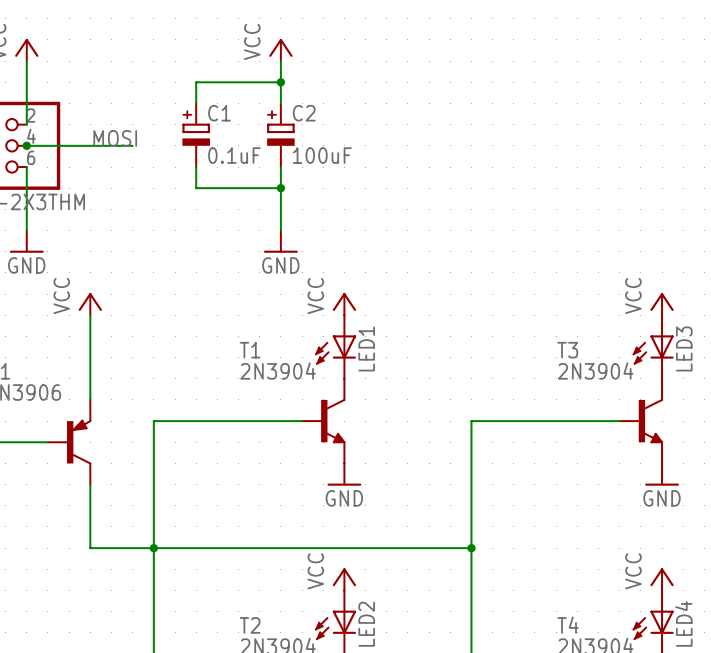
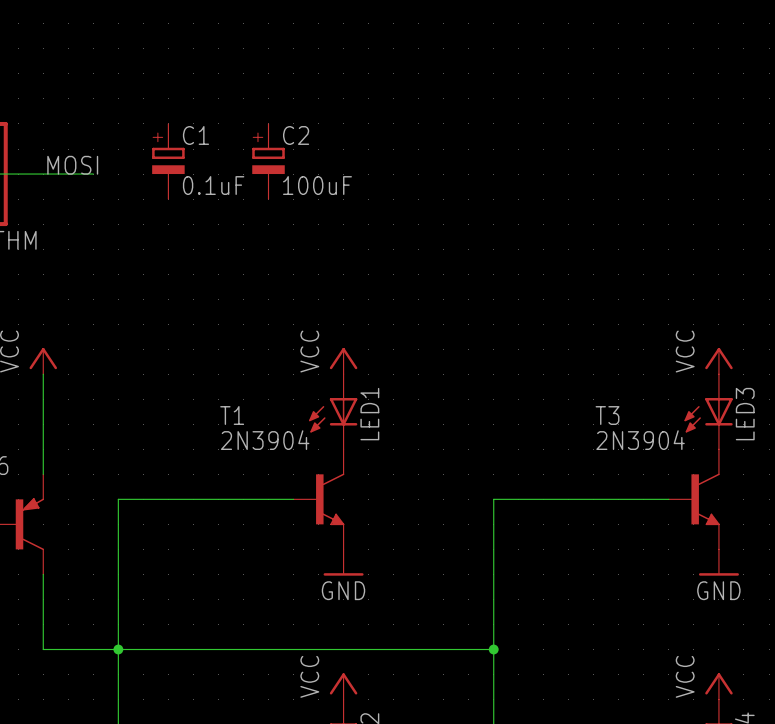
power symbol: VCC (280, 50) -> none
wire: (280, 61) (280, 103) -> none
wire: (280, 82) (196, 82) (196, 103) -> none
junction: (280, 82) -> none
wire: (196, 167) (196, 188) (280, 188) -> none
wire: (280, 167) (280, 230) -> none
junction: (280, 188) -> none
power symbol: GND (280, 241) -> none

